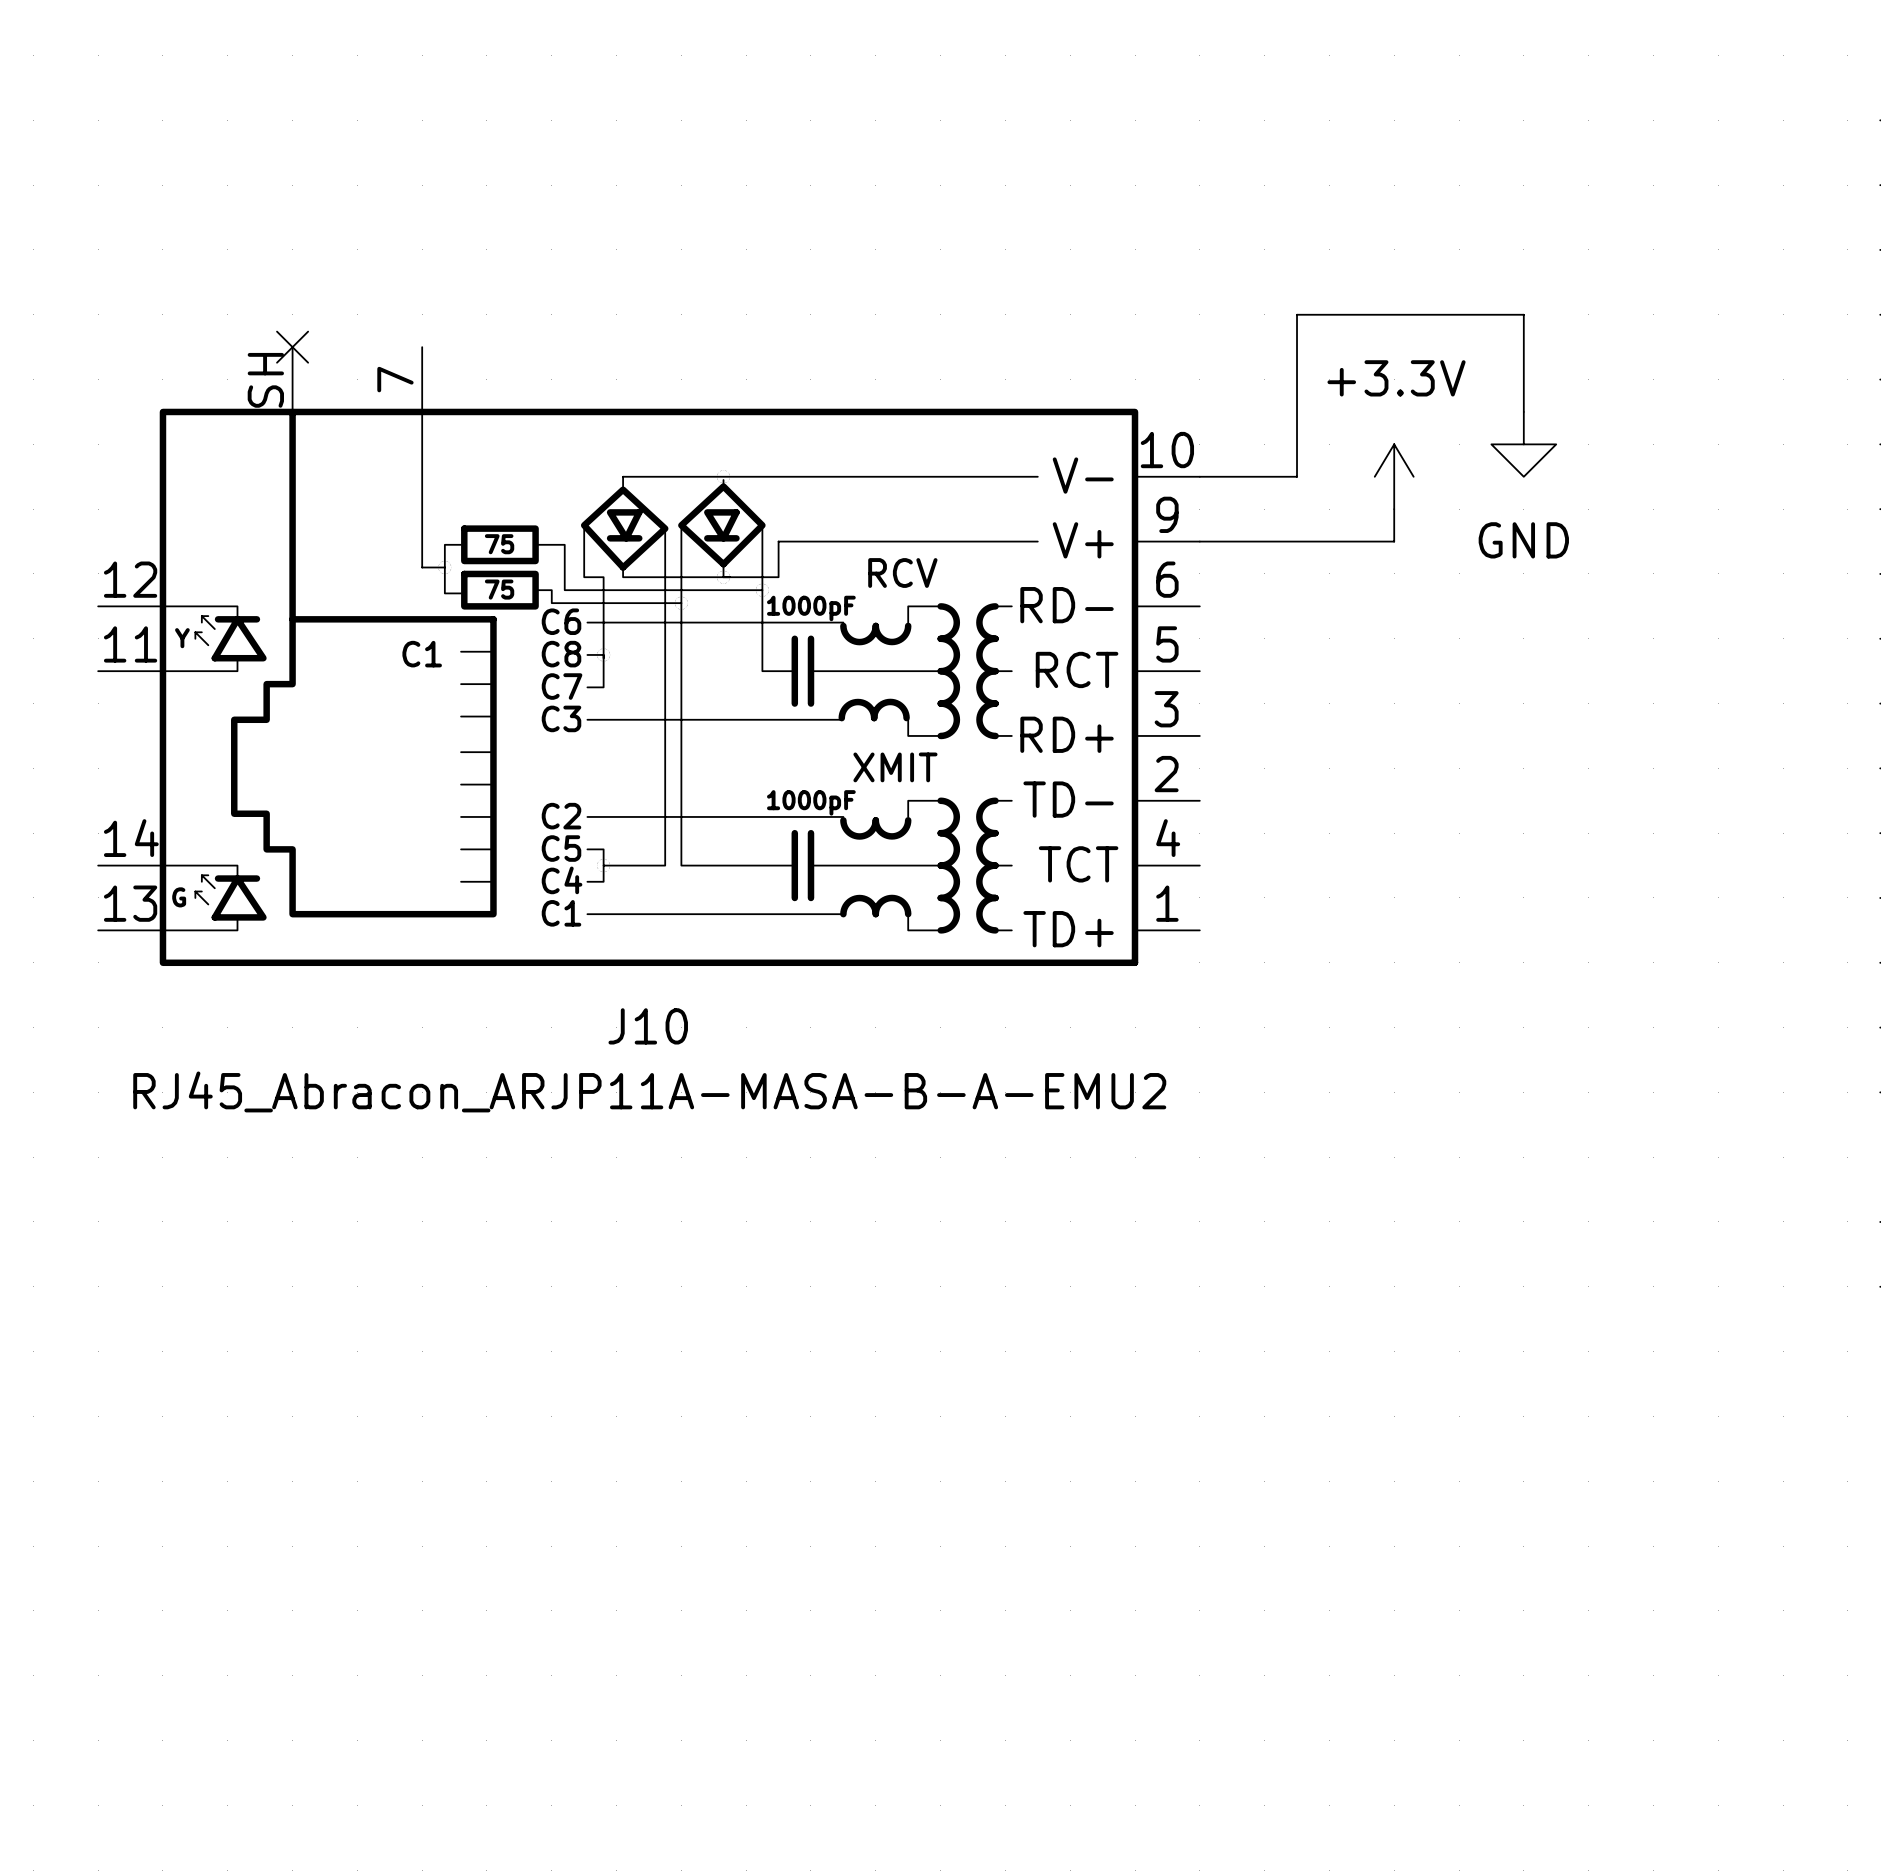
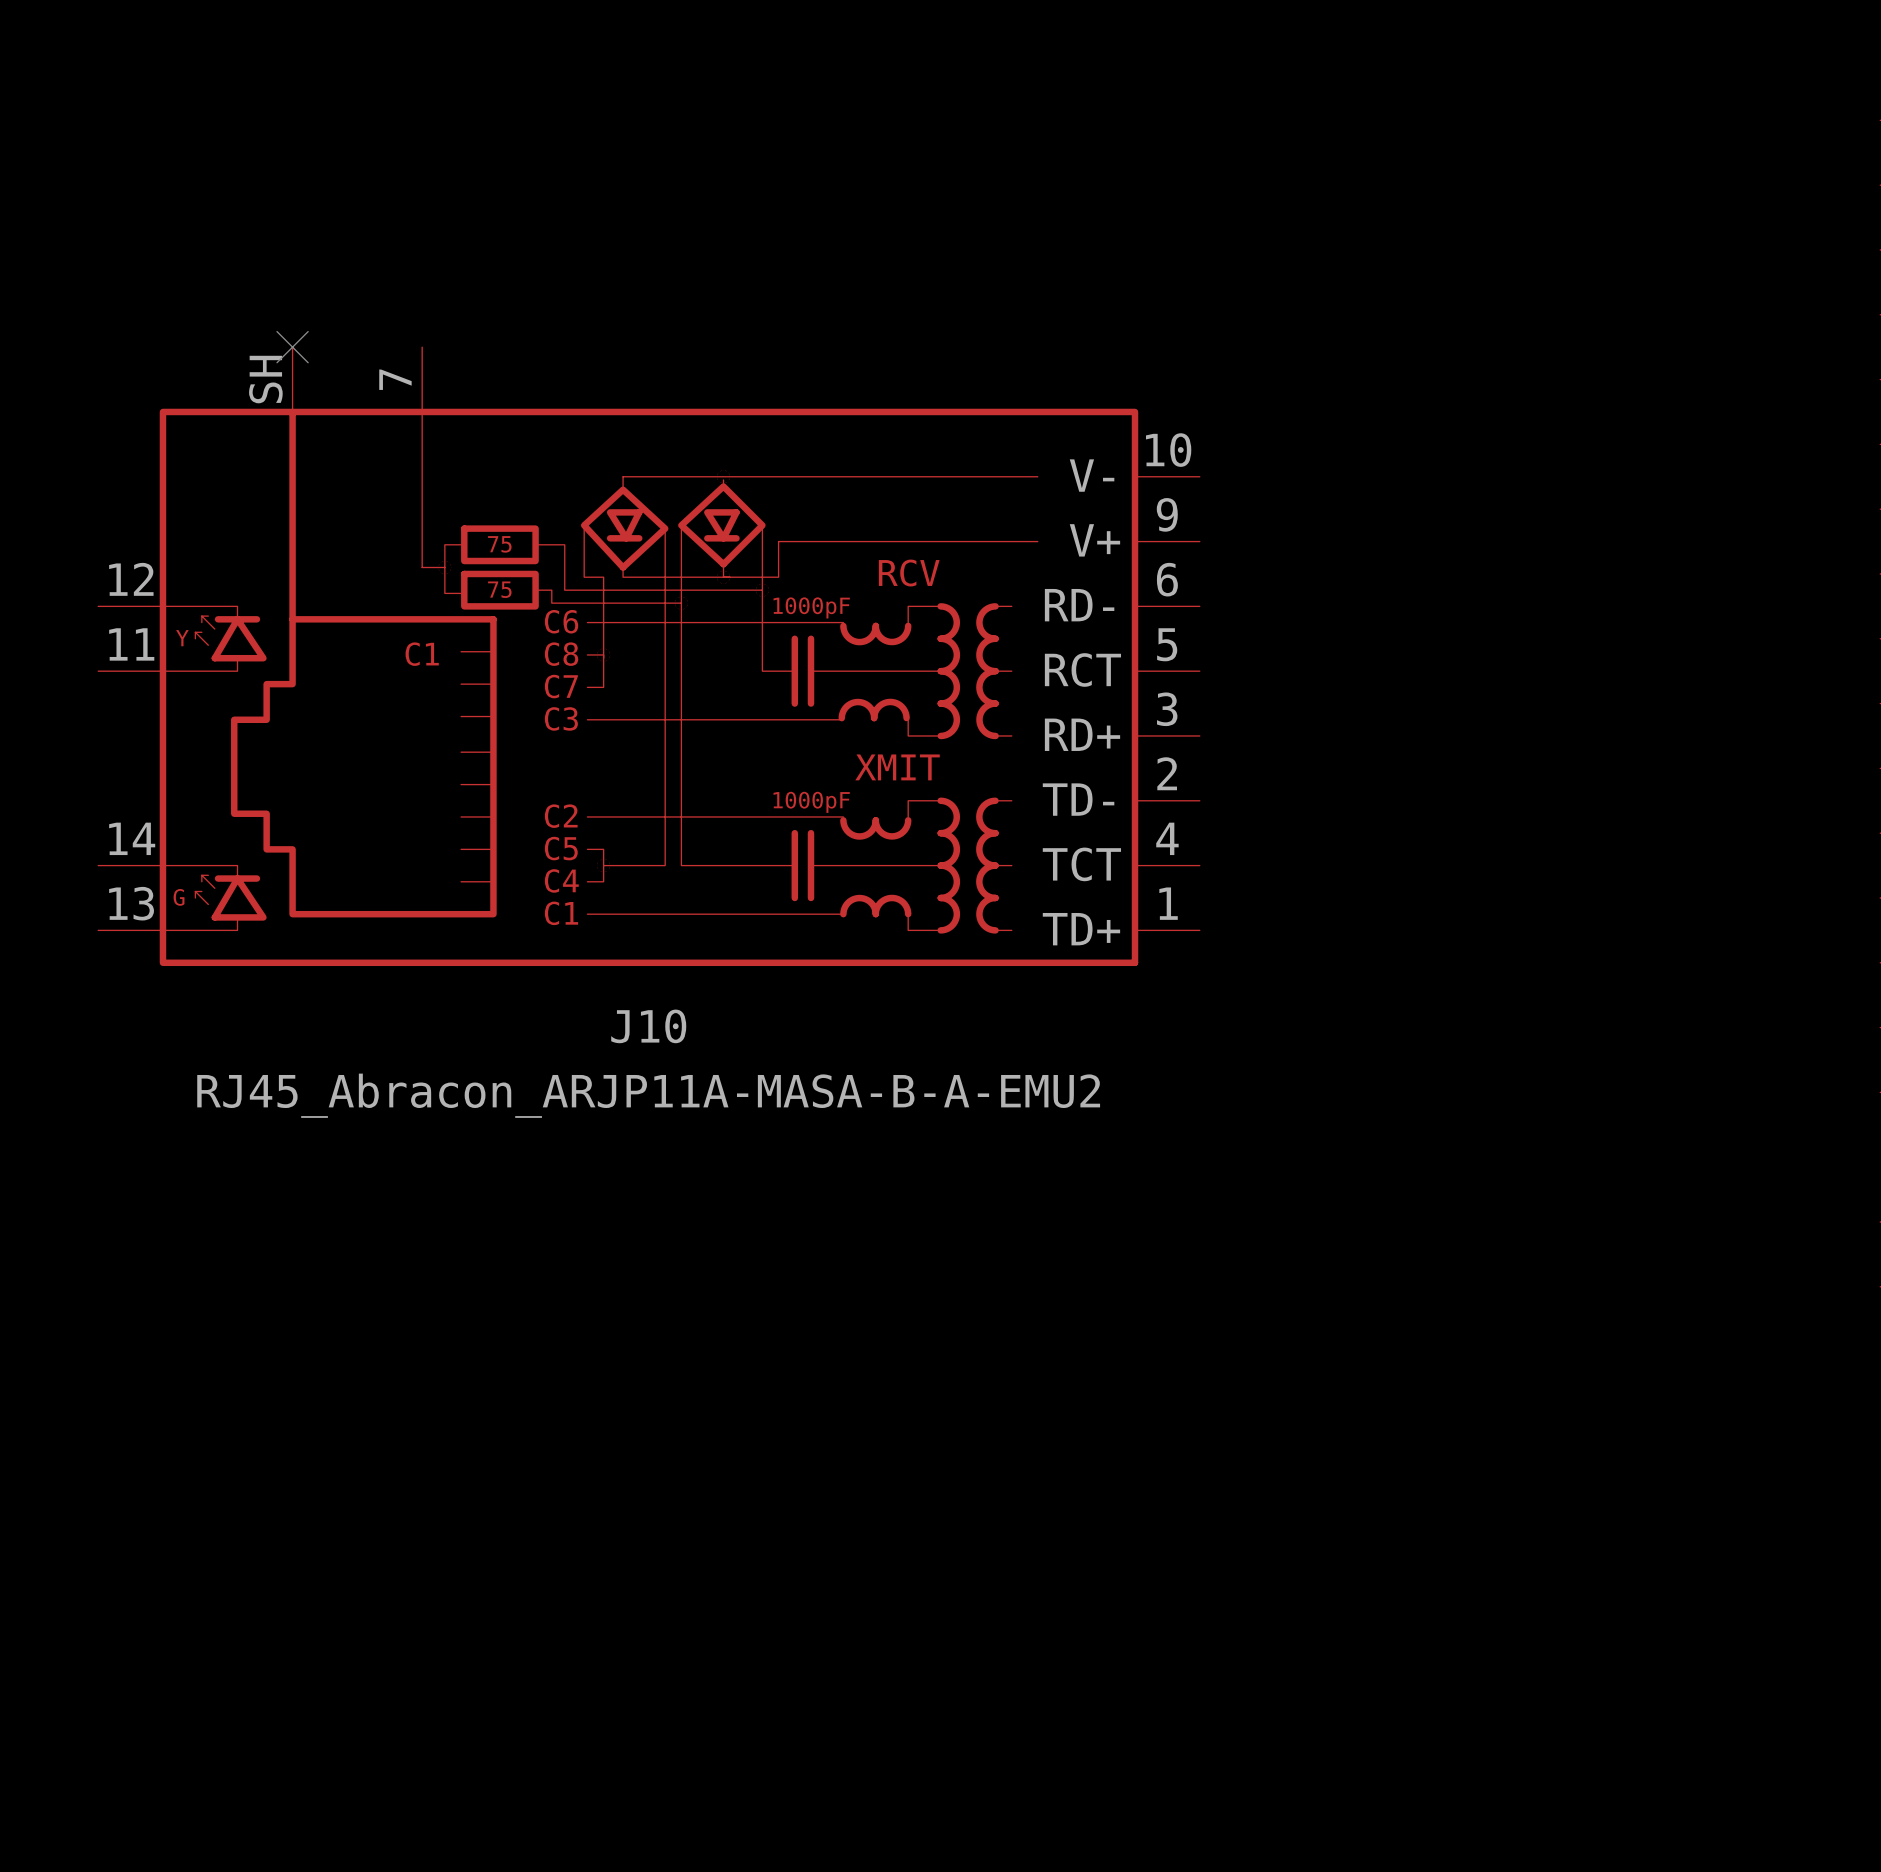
wire: (1523, 411) (1523, 314) (1297, 314) (1297, 476) (1199, 476) -> none
power symbol: GND (1523, 444) -> none
power symbol: +3.3V (1394, 476) -> none
wire: (1394, 509) (1394, 541) (1199, 541) -> none

